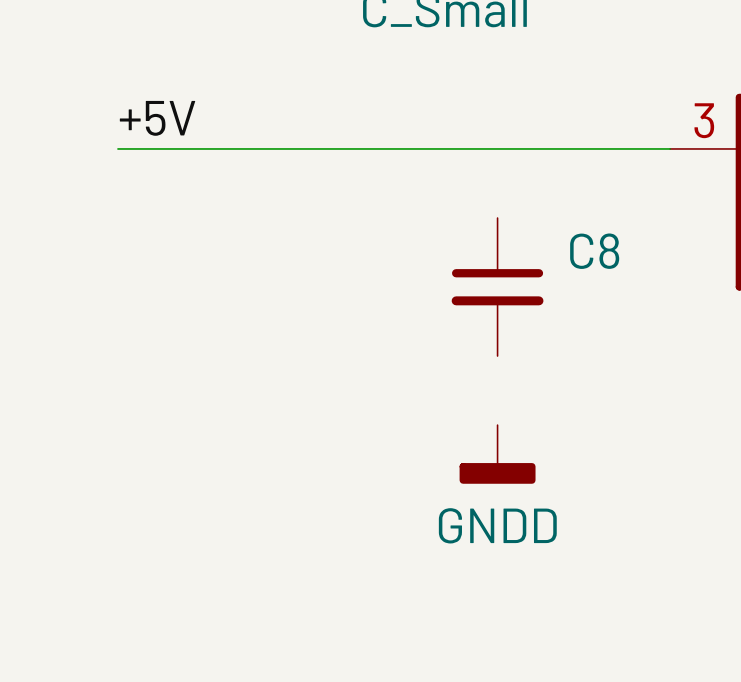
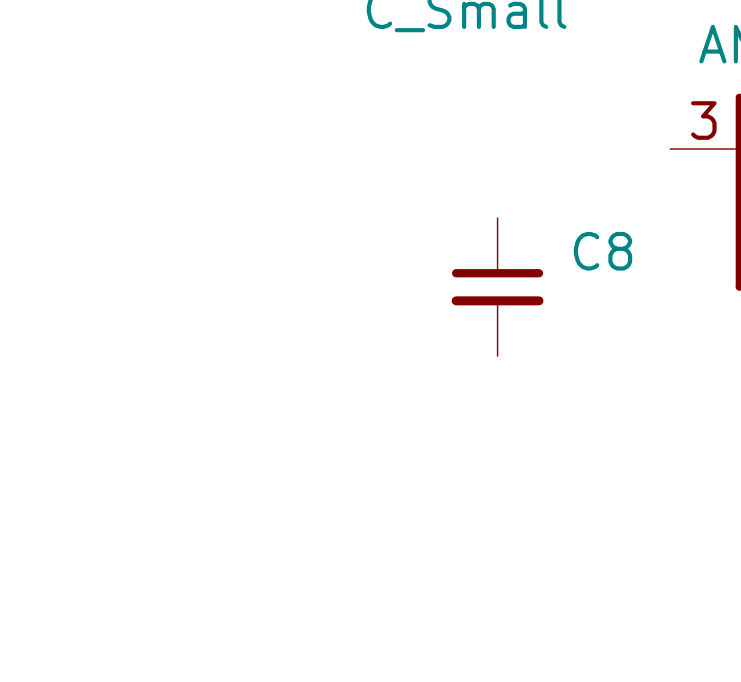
label: +5V (157, 118) -> none
wire: (117, 148) (670, 148) -> none
power symbol: GNDD (497, 454) -> none

